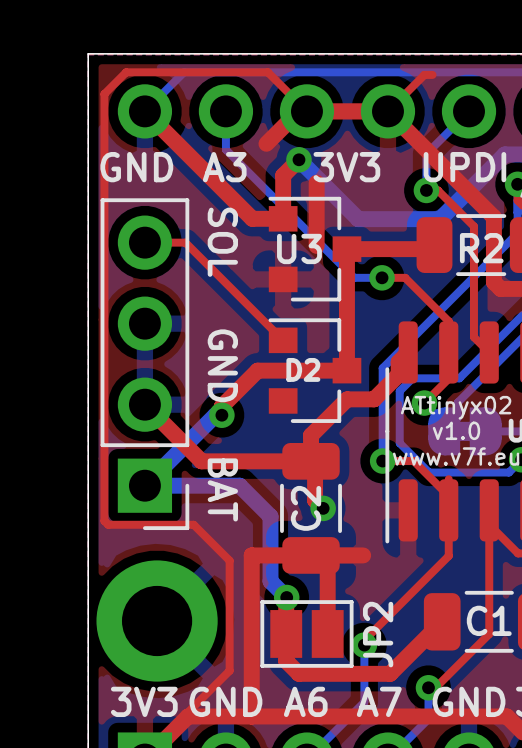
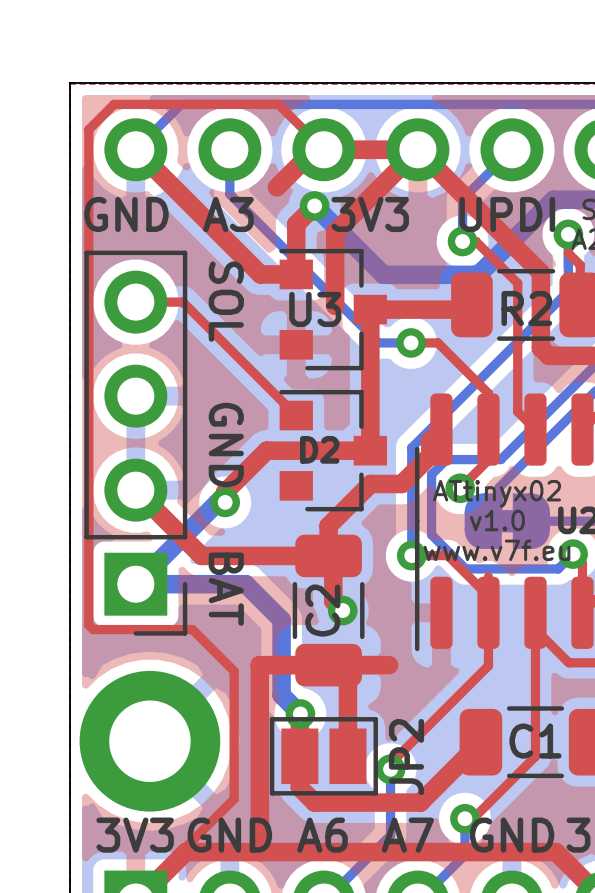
top track: (432, 74) (424, 74) (387, 111) -> (335, 232) (417, 149)

